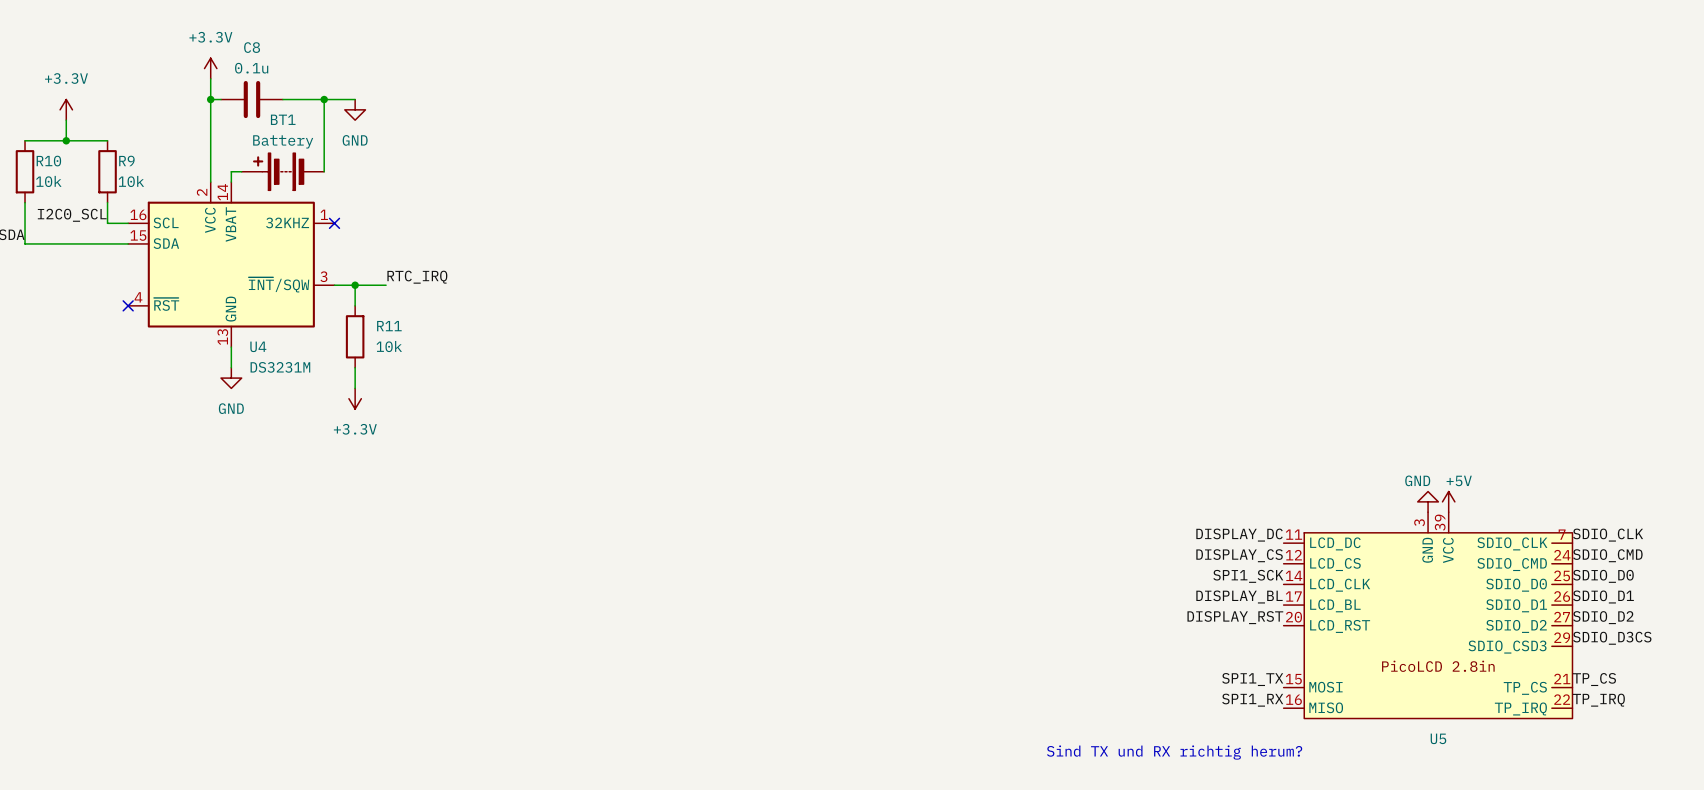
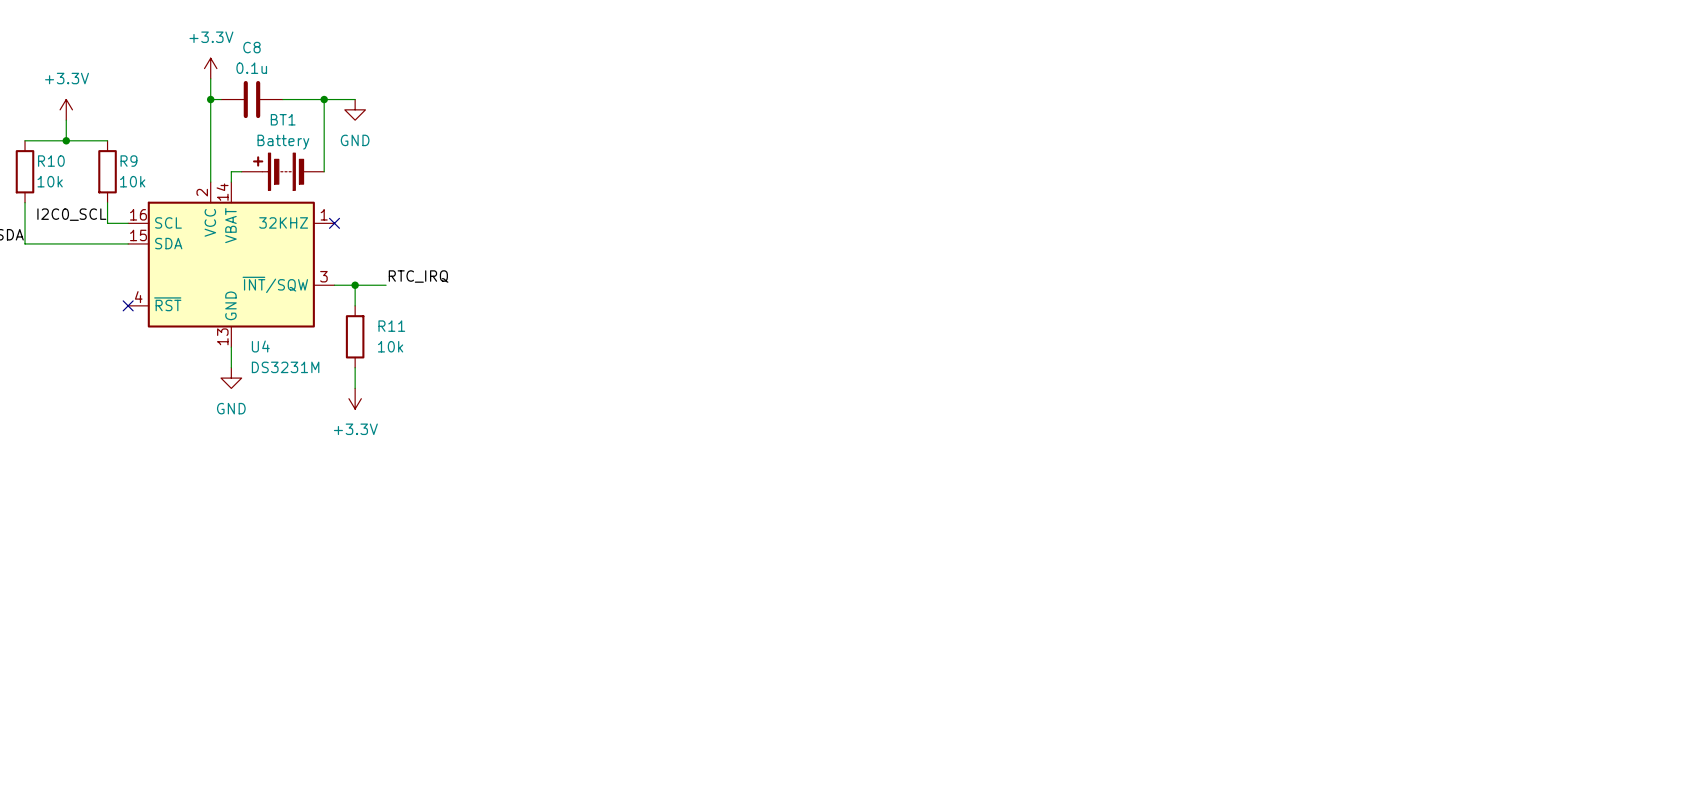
power symbol: GND (1428, 501) -> none
power symbol: +5V (1448, 501) -> none
label: DISPLAY_DC (1239, 535) -> none
label: SDIO_CLK (1608, 535) -> none
label: DISPLAY_CS (1239, 555) -> none
label: SDIO_CMD (1607, 555) -> none
label: SPI1_SCK (1248, 576) -> none
label: SDIO_D0 (1603, 576) -> none
label: DISPLAY_BL (1239, 597) -> none
label: SDIO_D1 (1603, 597) -> none
U5: (1428, 615) -> none
label: DISPLAY_RST (1235, 617) -> none
label: SDIO_D2 (1603, 617) -> none
label: SDIO_D3CS (1612, 638) -> none
label: SPI1_TX (1252, 679) -> none
label: TP_CS (1594, 679) -> none
label: SPI1_RX (1252, 700) -> none
label: TP_IRQ (1598, 700) -> none
text: Sind TX und RX richtig herum? (1174, 752) -> none

